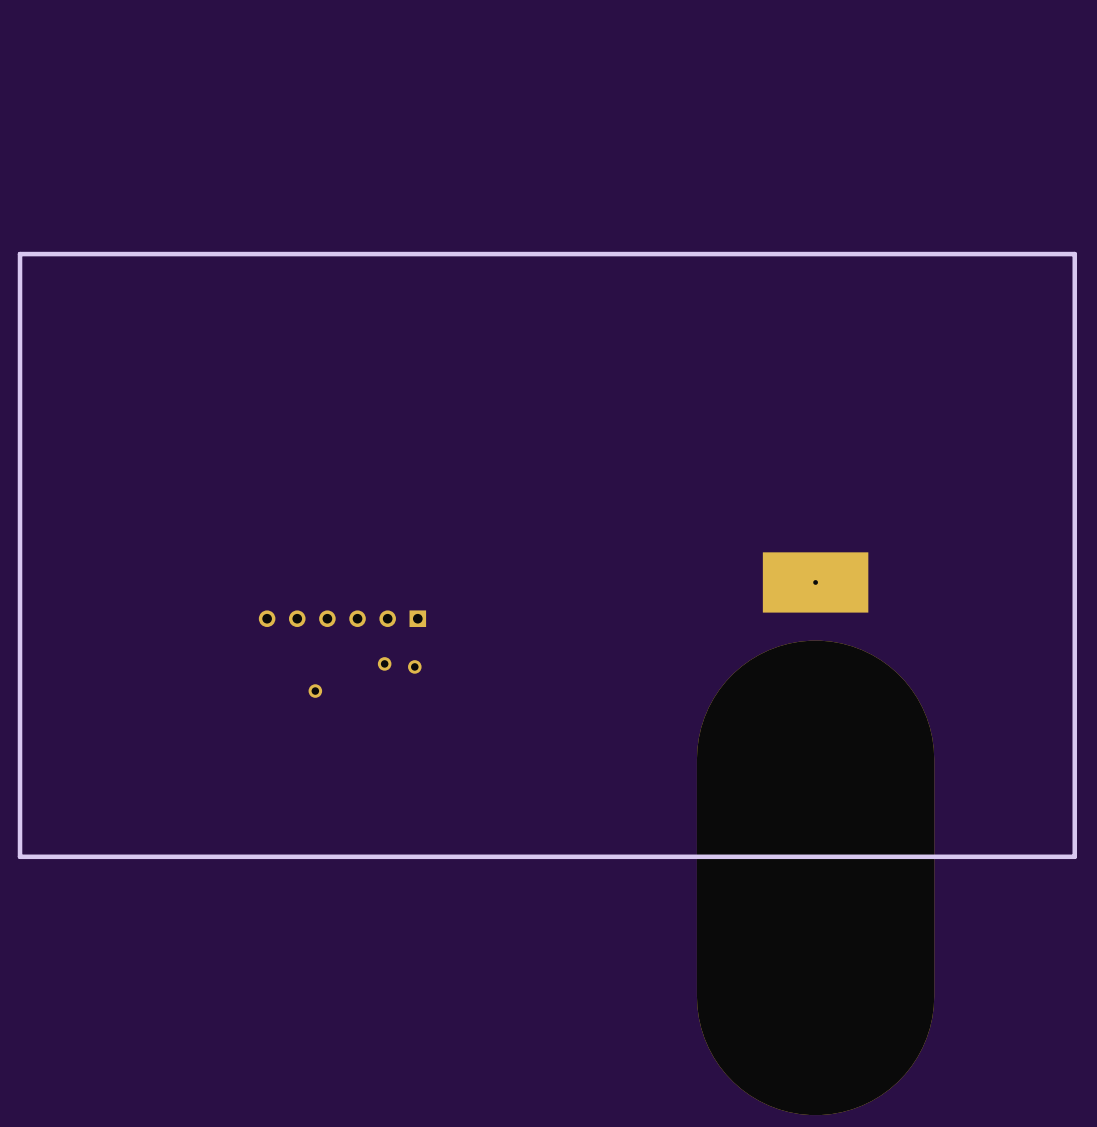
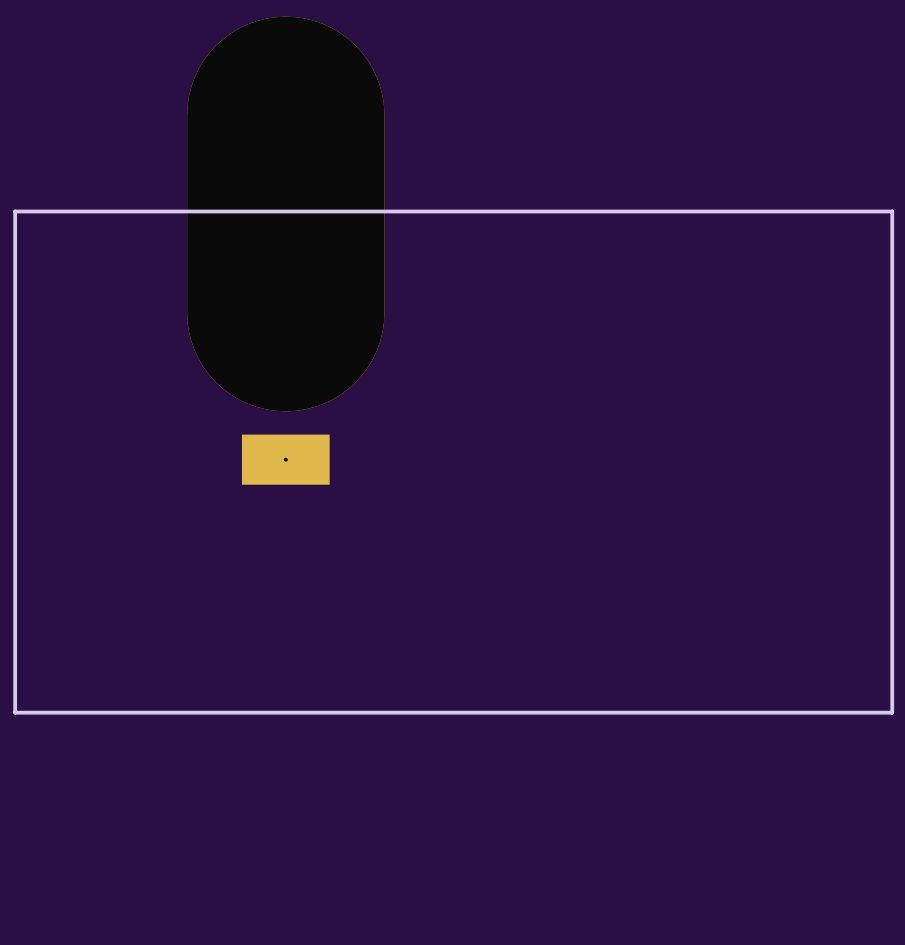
part: none -> (285, 250)
part: (342, 618) -> none
part: (384, 663) -> none
part: (414, 666) -> none
part: (315, 691) -> none
part: (815, 833) -> none

